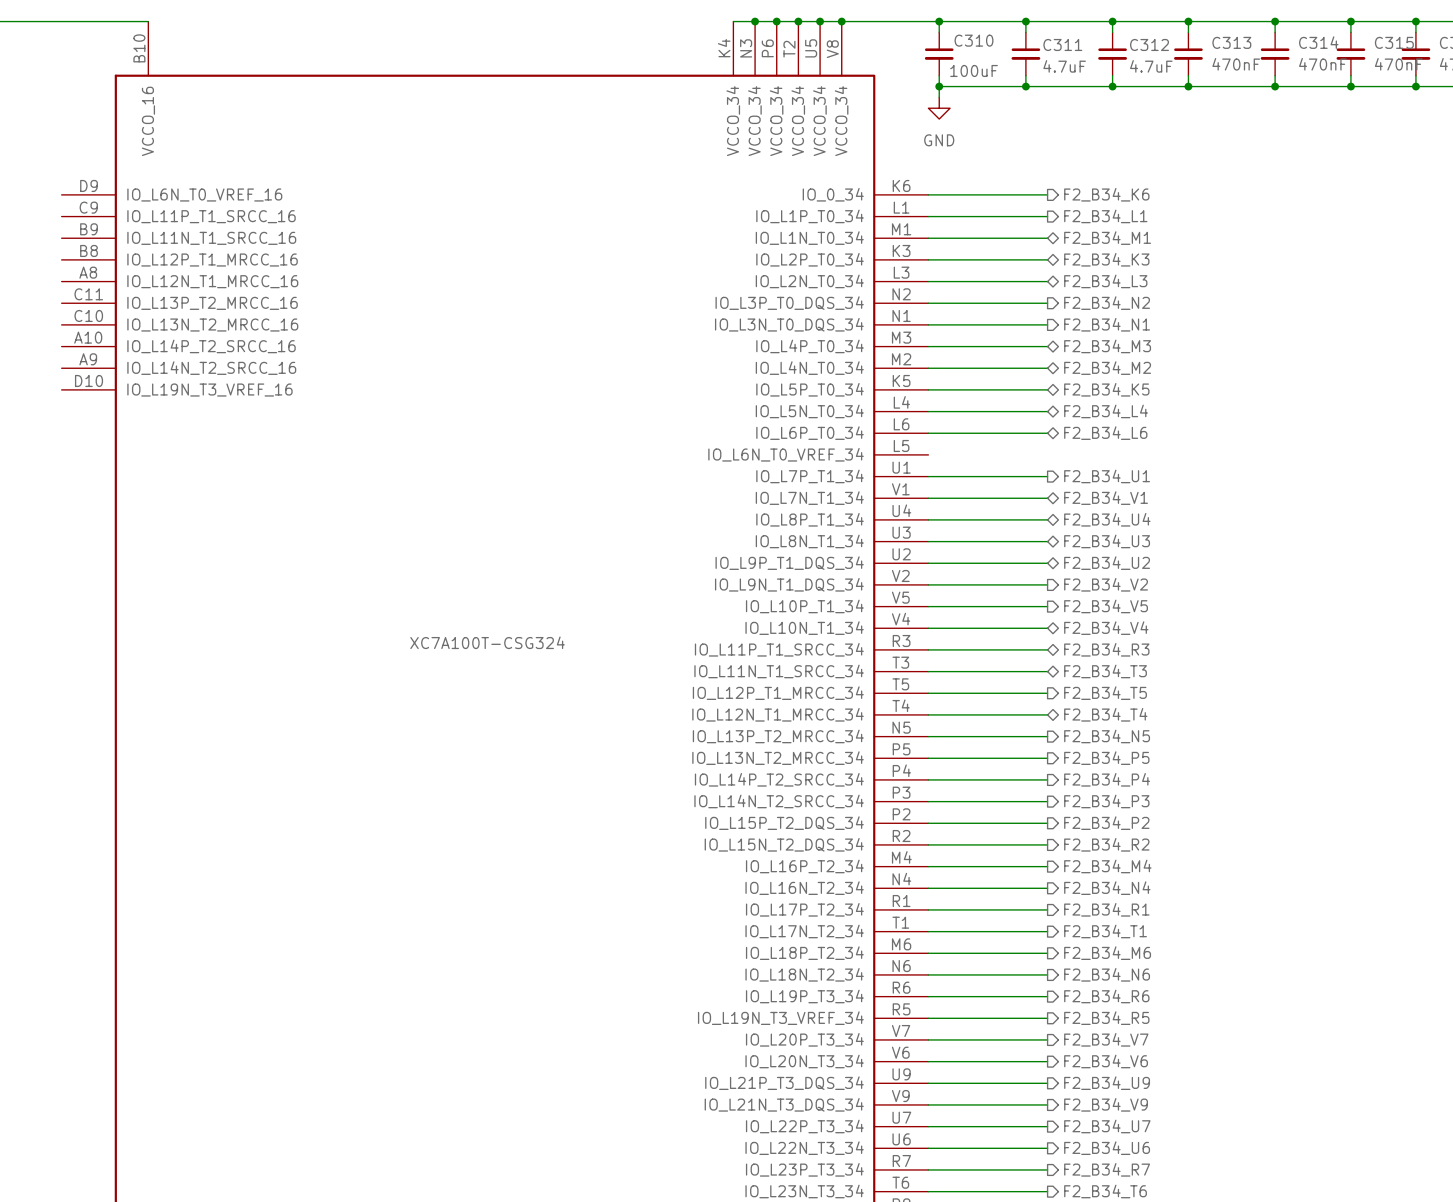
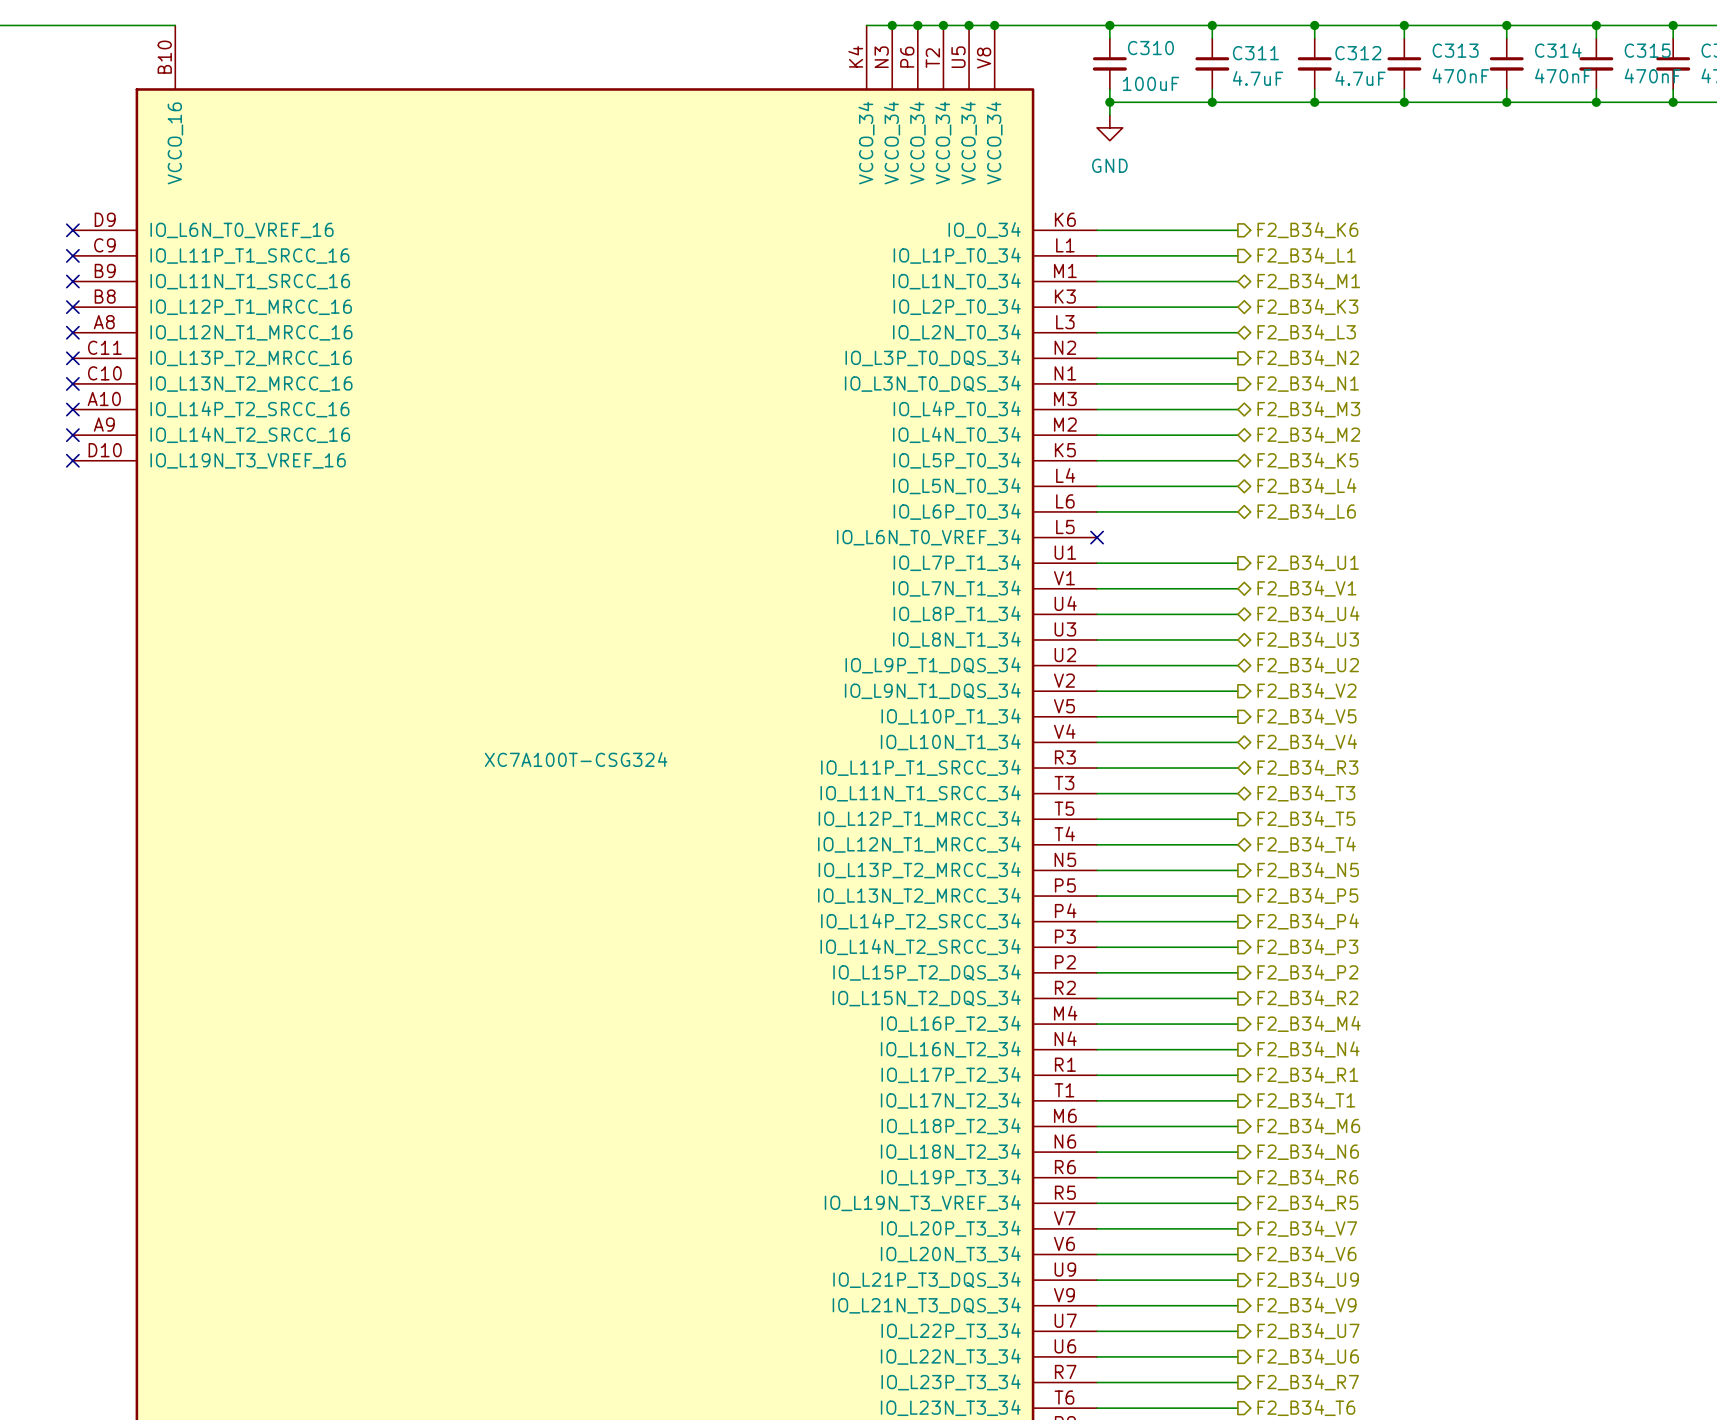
no-connect mark: none -> (72, 230)
no-connect mark: none -> (72, 255)
no-connect mark: none -> (72, 281)
no-connect mark: none -> (72, 307)
no-connect mark: none -> (72, 332)
no-connect mark: none -> (72, 358)
no-connect mark: none -> (72, 383)
no-connect mark: none -> (72, 409)
no-connect mark: none -> (72, 435)
no-connect mark: none -> (72, 460)
no-connect mark: none -> (1097, 537)

